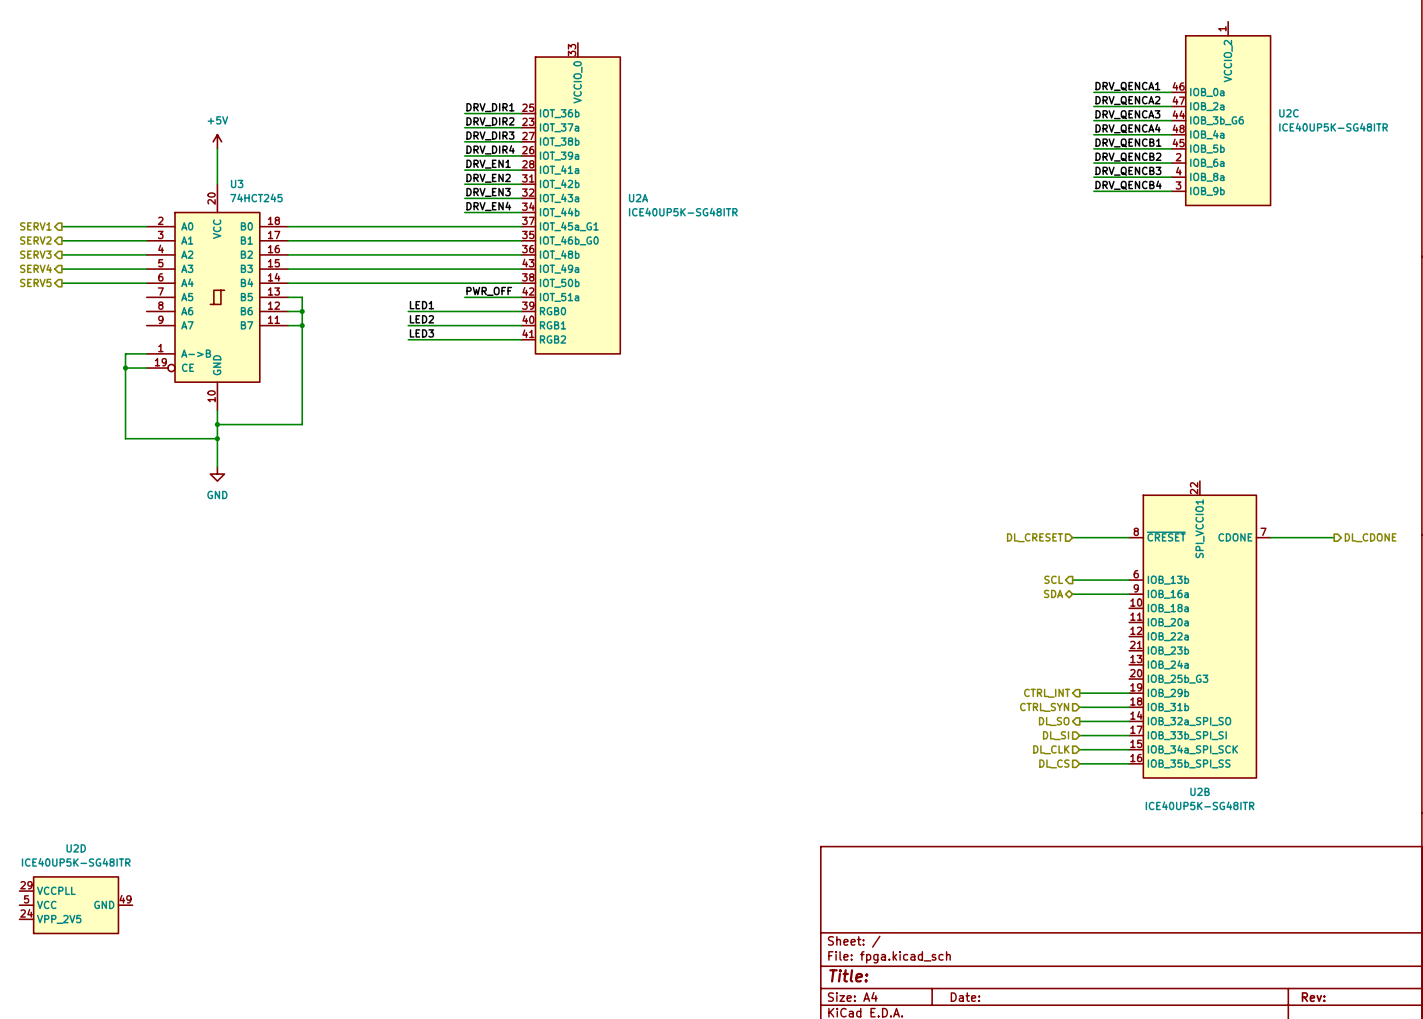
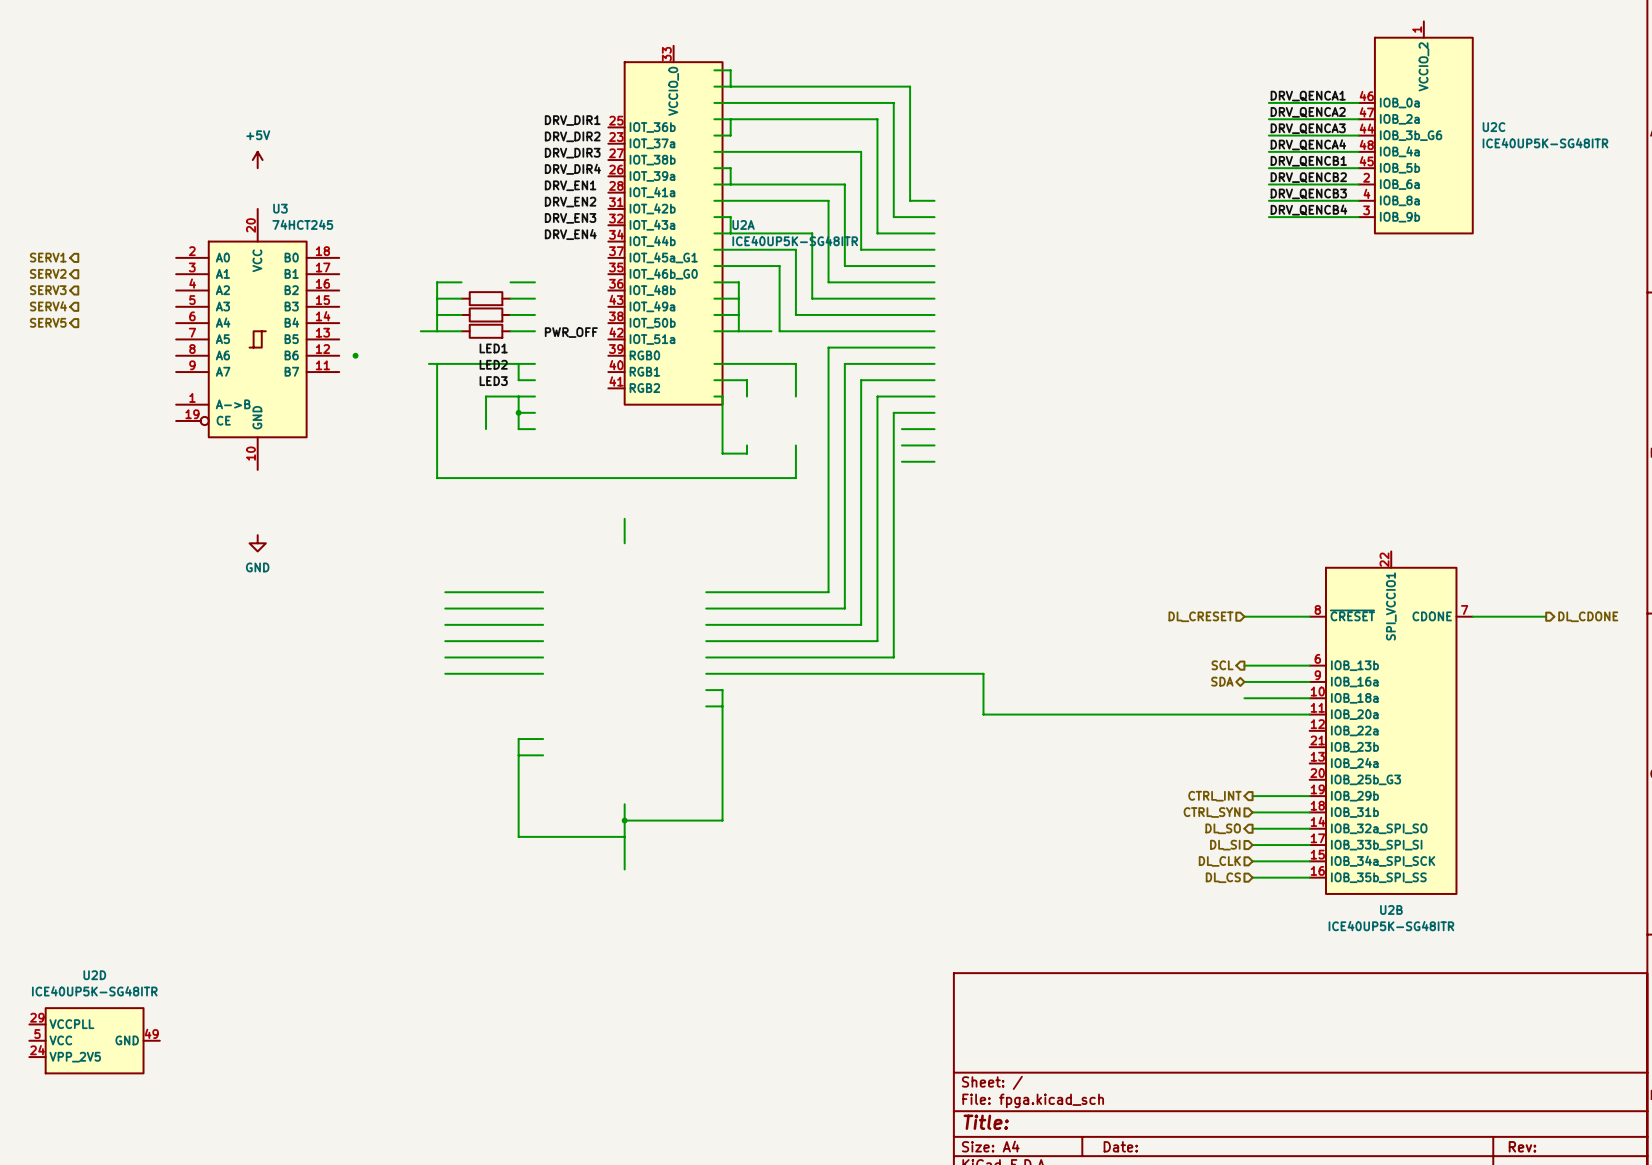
wire: none -> (714, 70) (730, 70) (730, 86)
wire: none -> (714, 86) (910, 86) (910, 200) (934, 200)
wire: none -> (714, 102) (893, 102) (893, 217) (934, 217)
wire: none -> (714, 119) (877, 119) (877, 233) (934, 233)
wire: none -> (730, 119) (730, 135) (714, 135)
wire: (464, 113) (521, 113) -> none
wire: (464, 127) (521, 127) -> none
wire: none -> (714, 151) (861, 151) (861, 249) (934, 249)
wire: (464, 141) (521, 141) -> none
wire: (217, 148) (217, 184) -> none
wire: none -> (714, 168) (730, 168) (730, 184)
wire: (464, 155) (521, 155) -> none
wire: none -> (714, 184) (844, 184) (844, 266) (934, 266)
wire: (464, 170) (521, 170) -> none
wire: none -> (714, 200) (828, 200) (828, 282) (934, 282)
wire: (464, 184) (521, 184) -> none
wire: none -> (714, 217) (730, 217) (730, 233)
wire: (464, 198) (521, 198) -> none
wire: none -> (714, 233) (812, 233) (812, 298) (934, 298)
wire: (464, 212) (521, 212) -> none
wire: none -> (714, 249) (795, 249) (795, 314) (934, 314)
wire: (61, 226) (146, 226) -> none
wire: (288, 226) (521, 226) -> none
wire: none -> (714, 266) (779, 266) (779, 331) (934, 331)
wire: (61, 240) (146, 240) -> none
wire: (288, 240) (521, 240) -> none
wire: none -> (461, 282) (437, 282) (437, 331)
wire: none -> (510, 282) (534, 282)
wire: none -> (714, 282) (738, 282) (738, 331)
wire: (61, 254) (146, 254) -> none
wire: (288, 254) (521, 254) -> none
wire: none -> (437, 298) (461, 298)
part: none -> (486, 298)
wire: none -> (510, 298) (534, 298)
wire: none -> (714, 298) (738, 298)
wire: (61, 269) (146, 269) -> none
wire: (288, 269) (521, 269) -> none
wire: none -> (437, 314) (461, 314)
part: none -> (486, 314)
wire: none -> (510, 314) (534, 314)
wire: none -> (714, 314) (738, 314)
wire: (61, 283) (146, 283) -> none
wire: (288, 283) (521, 283) -> none
wire: none -> (420, 331) (461, 331)
part: none -> (486, 331)
wire: none -> (510, 331) (534, 331)
wire: none -> (714, 331) (771, 331)
wire: (288, 297) (302, 297) (302, 424) (217, 424) -> none
wire: (464, 297) (521, 297) -> none
wire: none -> (934, 347) (828, 347) (828, 592) (706, 592)
wire: (288, 311) (302, 311) -> none
wire: (408, 311) (521, 311) -> none
wire: none -> (428, 363) (534, 363)
wire: none -> (437, 363) (437, 478) (795, 478) (795, 445)
wire: none -> (518, 363) (518, 380) (534, 380)
wire: none -> (714, 363) (795, 363) (795, 396)
wire: none -> (934, 363) (844, 363) (844, 608) (706, 608)
wire: (288, 325) (302, 325) -> none
junction: (302, 325) -> none
wire: (408, 325) (521, 325) -> none
wire: none -> (714, 380) (746, 380) (746, 396)
wire: none -> (934, 380) (861, 380) (861, 624) (706, 624)
wire: (408, 339) (521, 339) -> none
wire: none -> (518, 396) (518, 429) (534, 429)
wire: none -> (534, 396) (486, 396) (486, 429)
wire: none -> (714, 396) (722, 396) (722, 453) (746, 453) (746, 445)
wire: none -> (934, 396) (877, 396) (877, 641) (706, 641)
wire: (146, 353) (125, 353) (125, 438) (217, 438) -> none
wire: none -> (518, 412) (534, 412)
junction: none -> (518, 412)
wire: none -> (934, 412) (893, 412) (893, 657) (706, 657)
wire: (125, 368) (146, 368) -> none
junction: (125, 368) -> none
wire: none -> (901, 429) (934, 429)
wire: none -> (901, 445) (934, 445)
wire: none -> (901, 461) (934, 461)
wire: (217, 410) (217, 466) -> none
junction: (217, 424) -> none
junction: (217, 438) -> none
wire: none -> (624, 518) (624, 543)
wire: none -> (445, 592) (543, 592)
wire: none -> (445, 608) (543, 608)
wire: none -> (445, 624) (543, 624)
wire: none -> (445, 641) (543, 641)
wire: none -> (445, 657) (543, 657)
wire: none -> (445, 673) (543, 673)
wire: none -> (706, 673) (983, 673) (983, 714) (1309, 714)
wire: none -> (706, 690) (722, 690) (722, 820) (624, 820)
wire: none -> (1244, 698) (1309, 698)
wire: none -> (706, 706) (722, 706)
wire: none -> (543, 739) (518, 739) (518, 836) (624, 836)
wire: none -> (518, 755) (543, 755)
wire: none -> (624, 804) (624, 869)
junction: none -> (624, 820)

